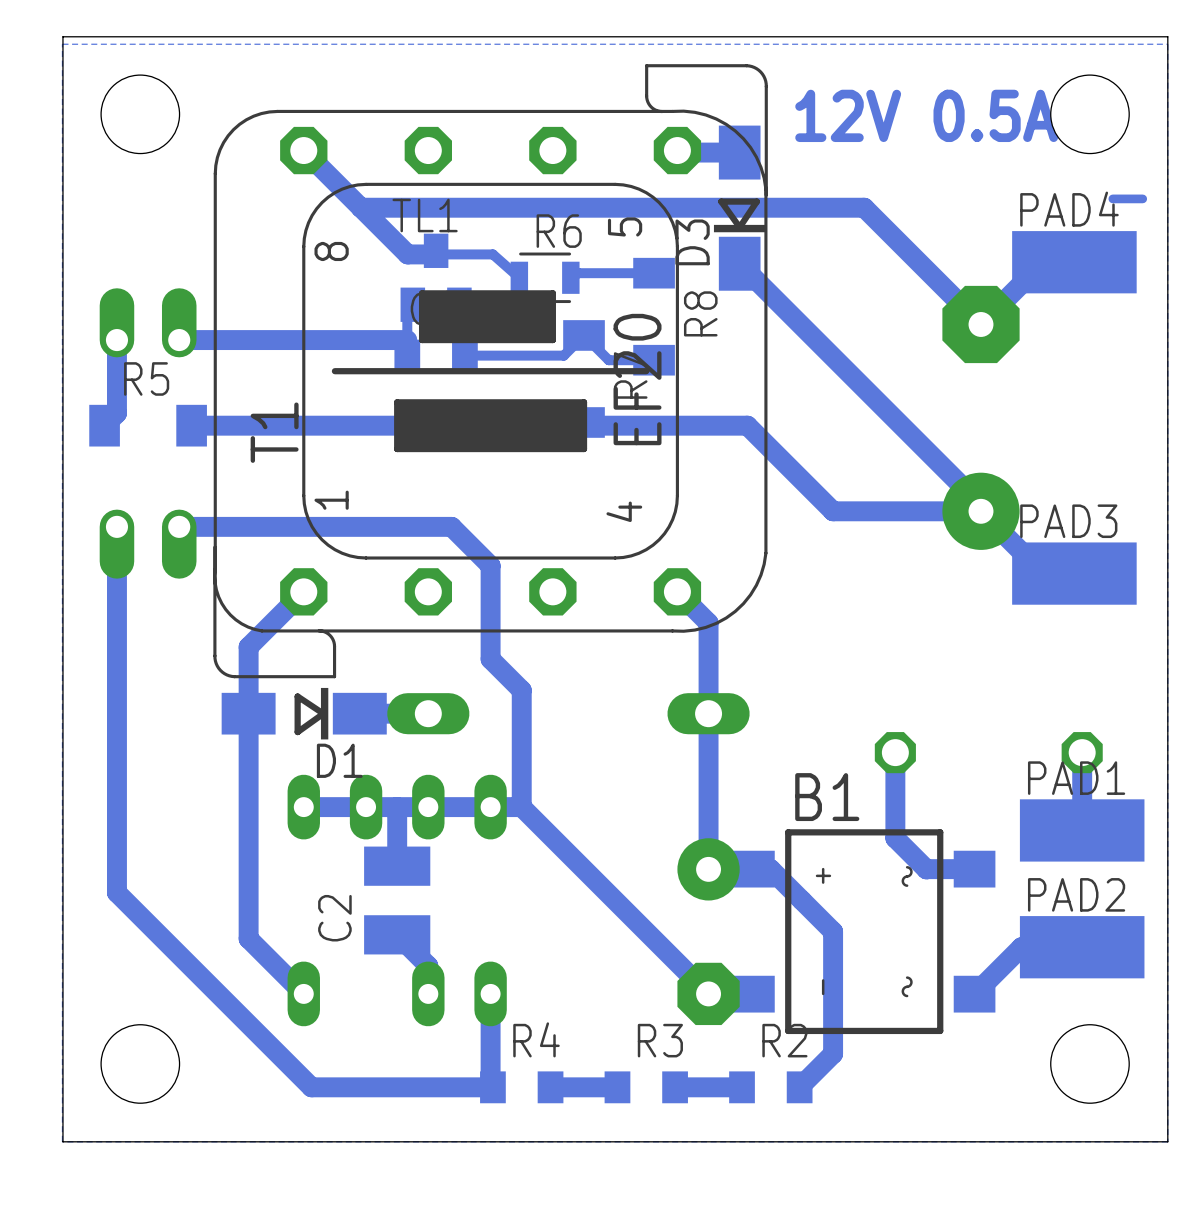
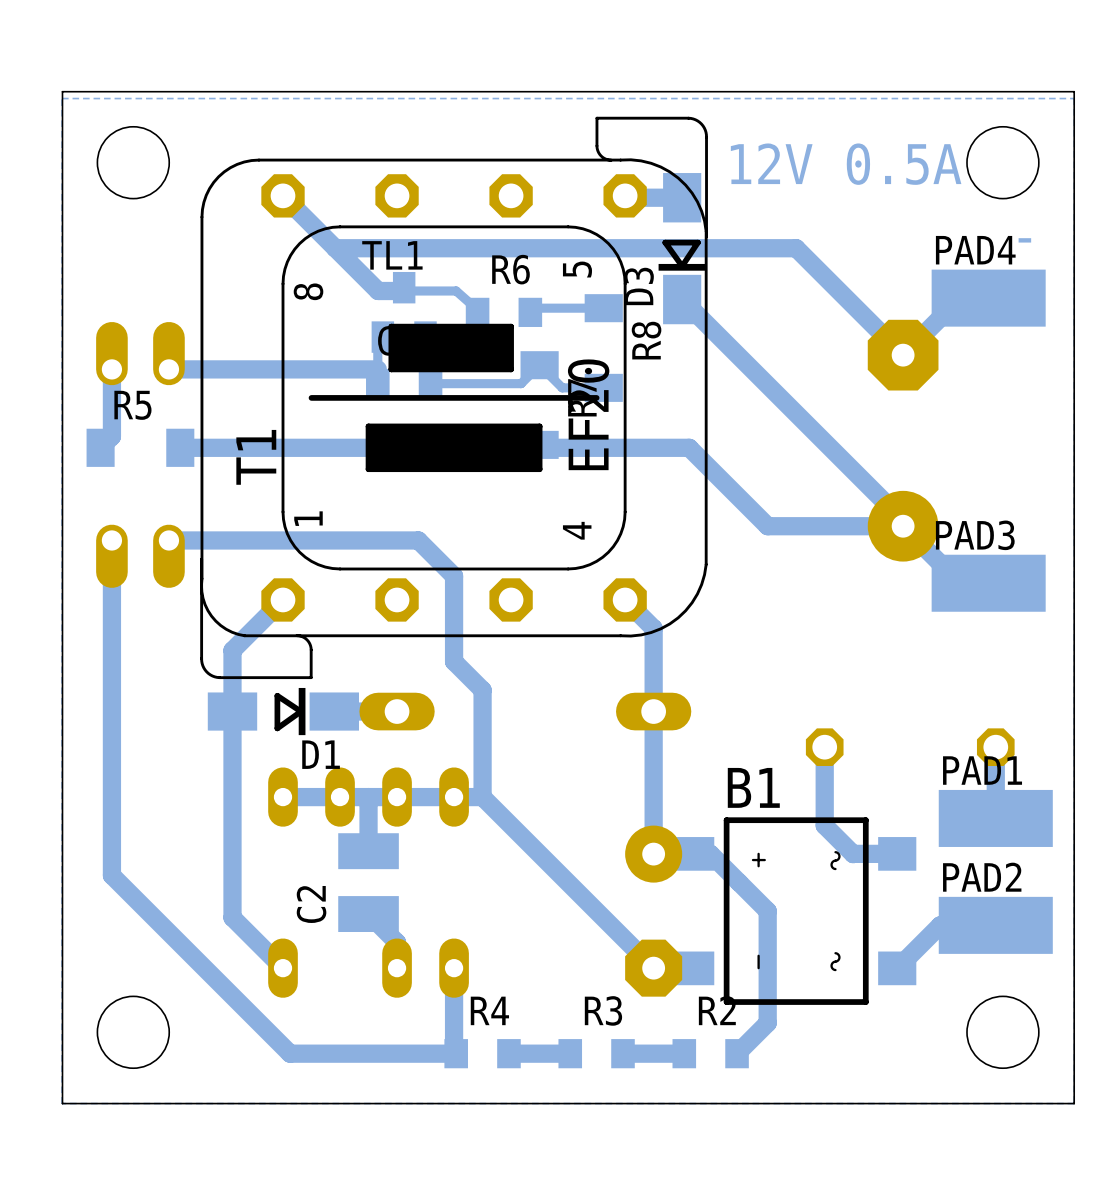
R6 footprint: [510, 252, 580, 304] -> [465, 297, 543, 327]

